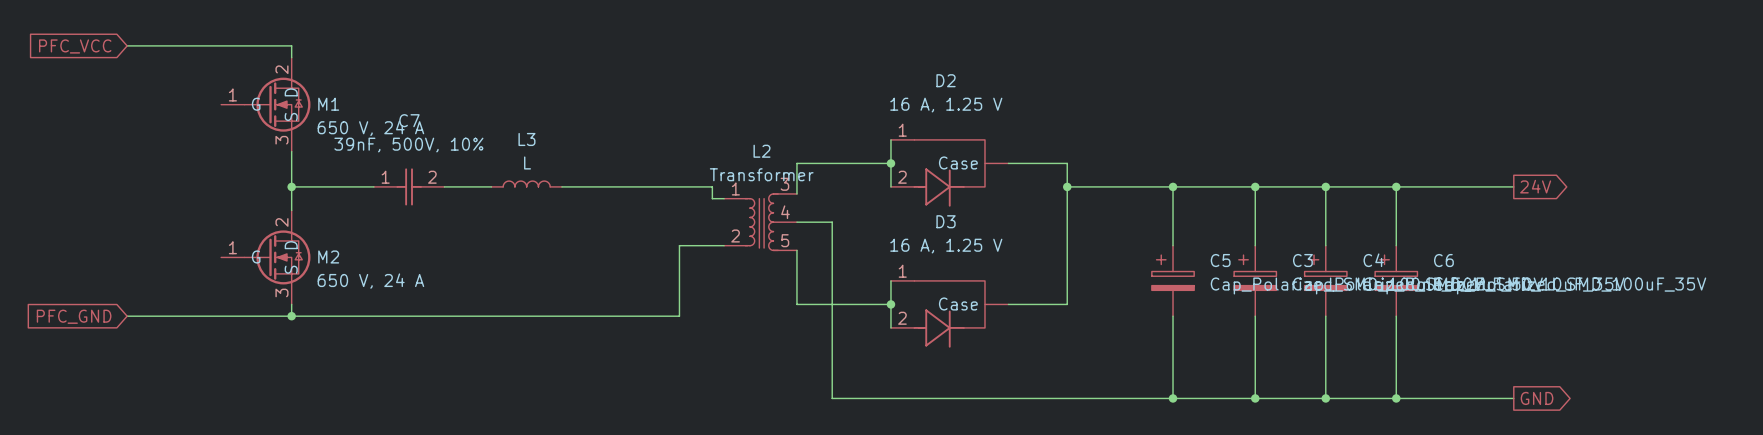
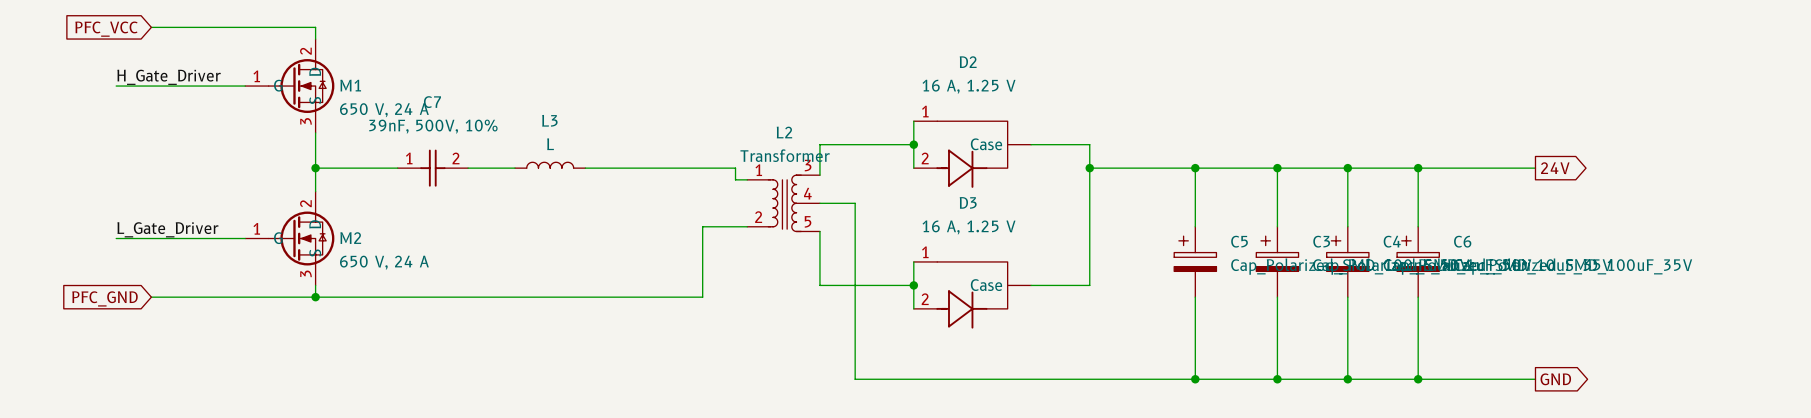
label: none -> H_Gate_Driver (169, 77)
wire: none -> (116, 86) (245, 86)
label: none -> L_Gate_Driver (167, 229)
wire: none -> (116, 238) (245, 238)

